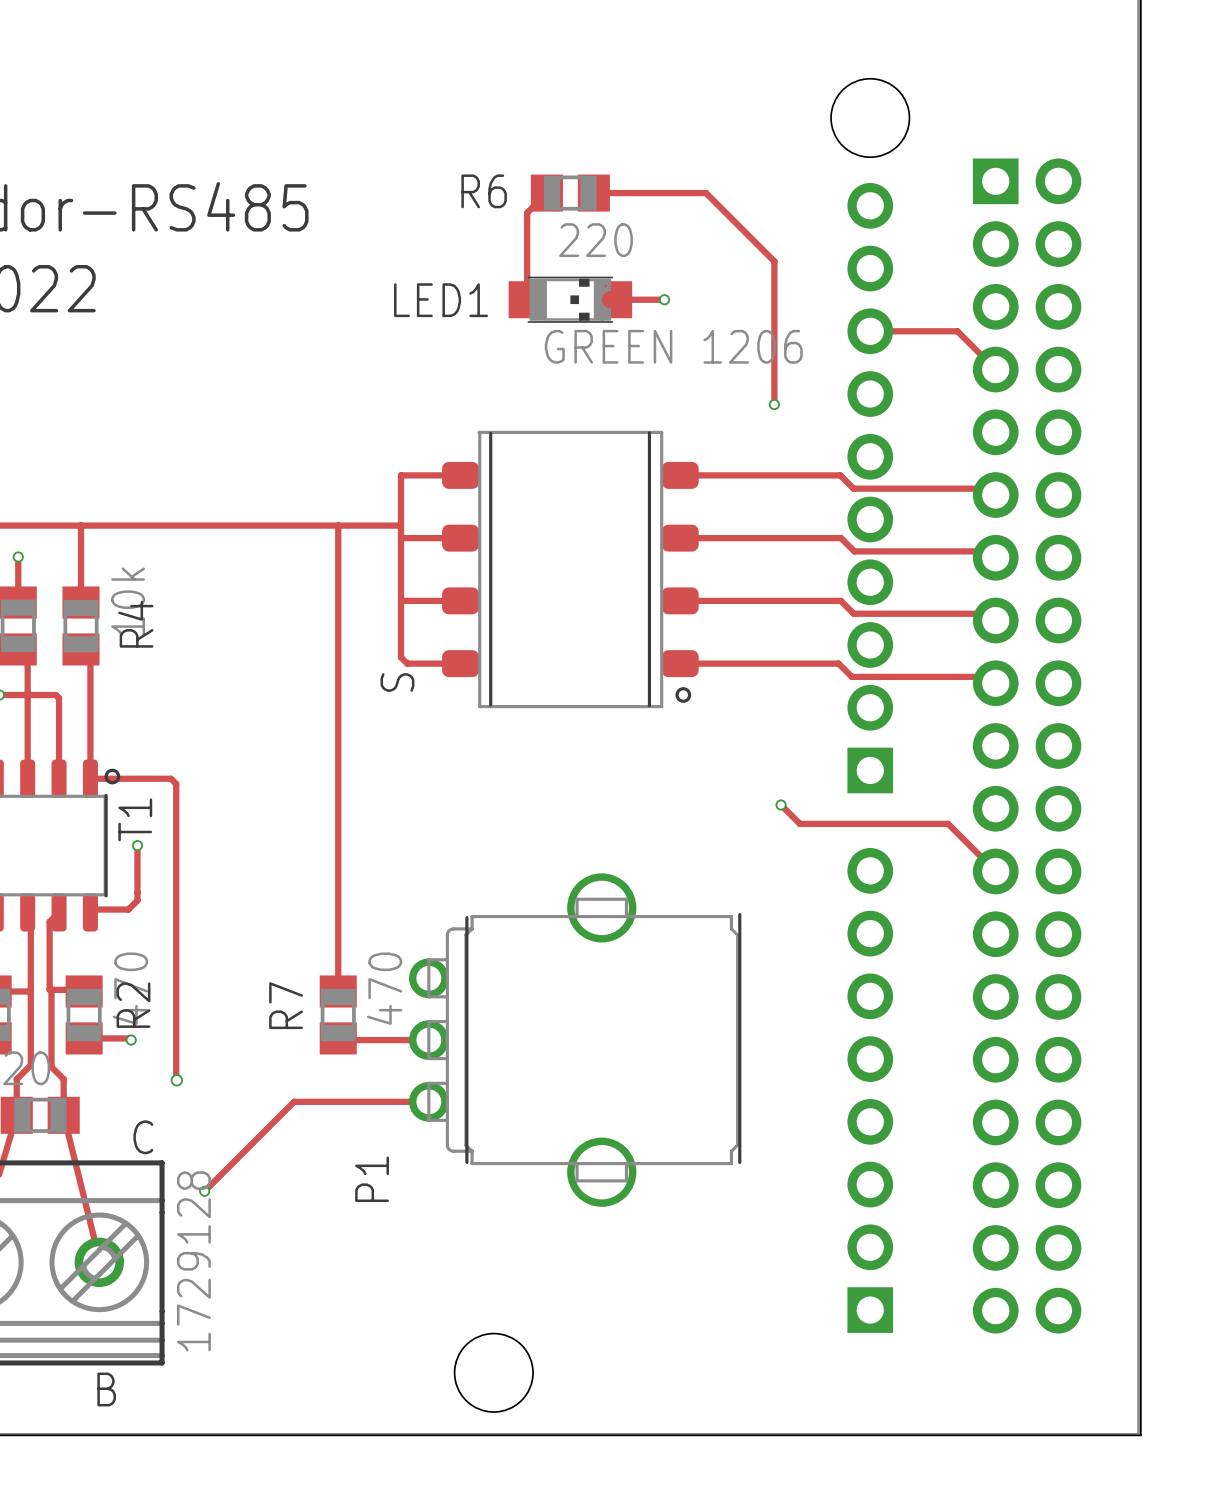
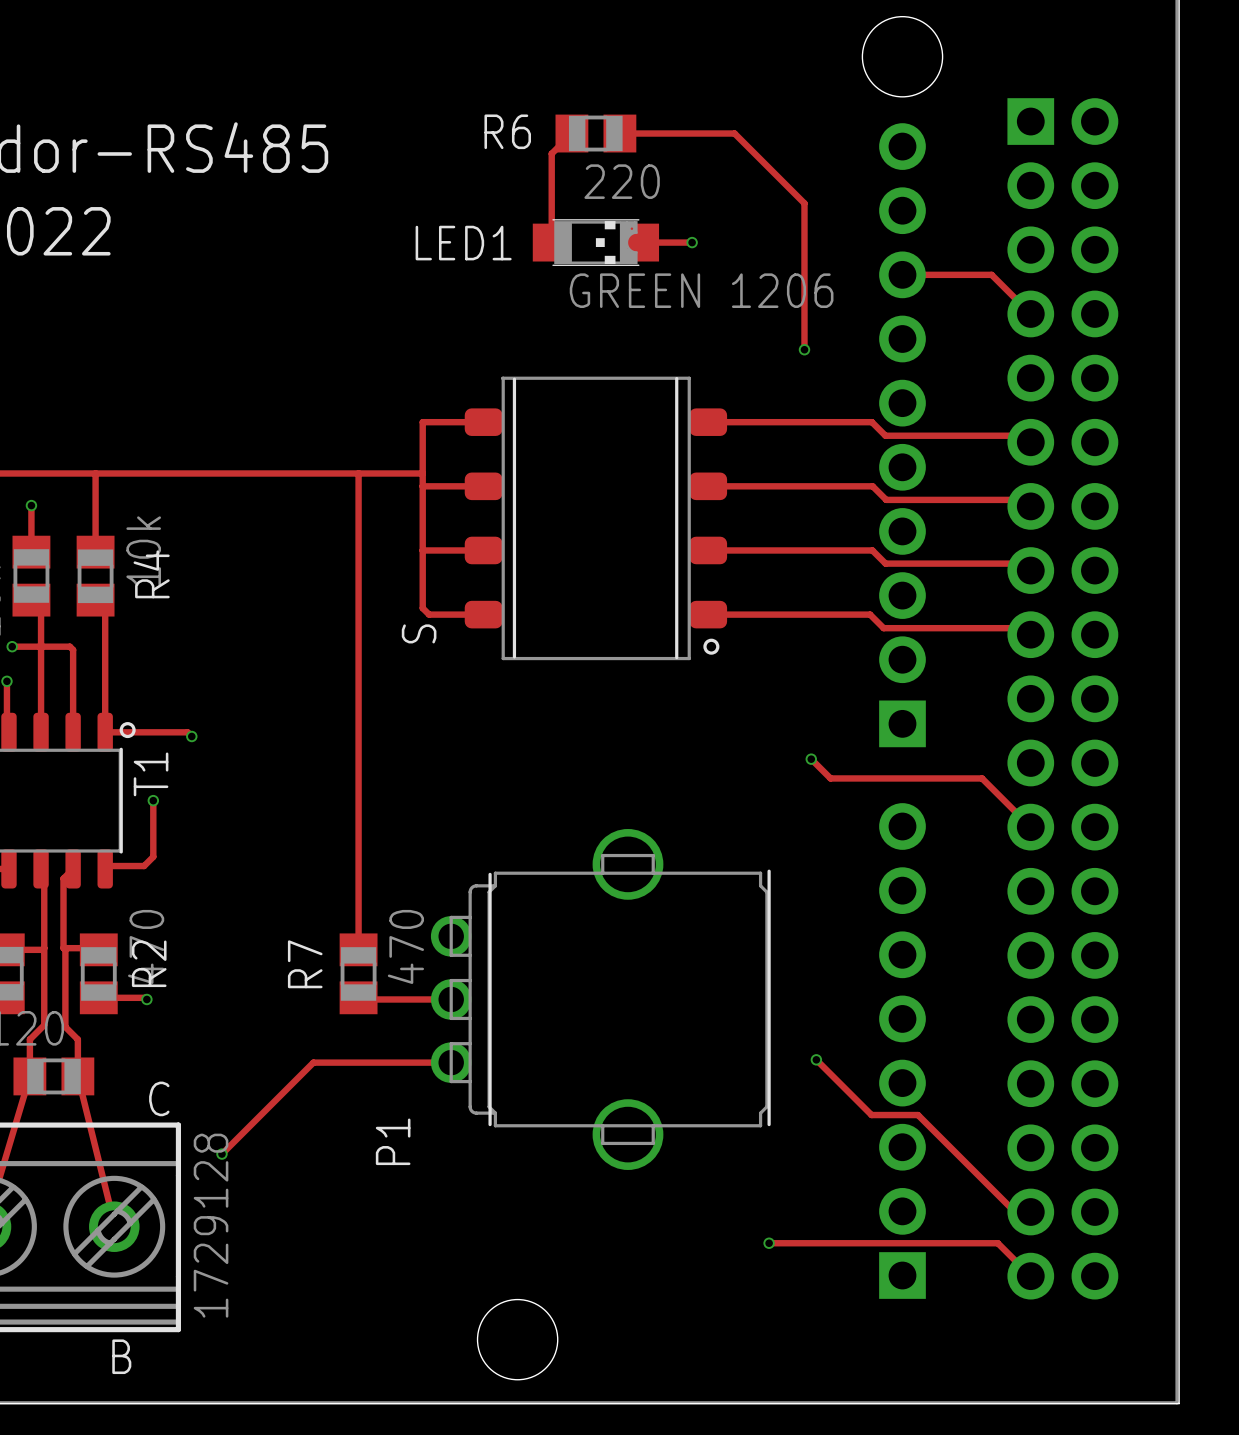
track: (175, 782) (176, 1080) -> none
via: none -> (191, 736)
via: (176, 1080) -> none
track: none -> (816, 1059) (871, 1115) (918, 1115) (1014, 1212) (1030, 1212)
via: none -> (816, 1059)
track: none -> (769, 1243) (997, 1243) (1030, 1276)
via: none -> (769, 1243)

